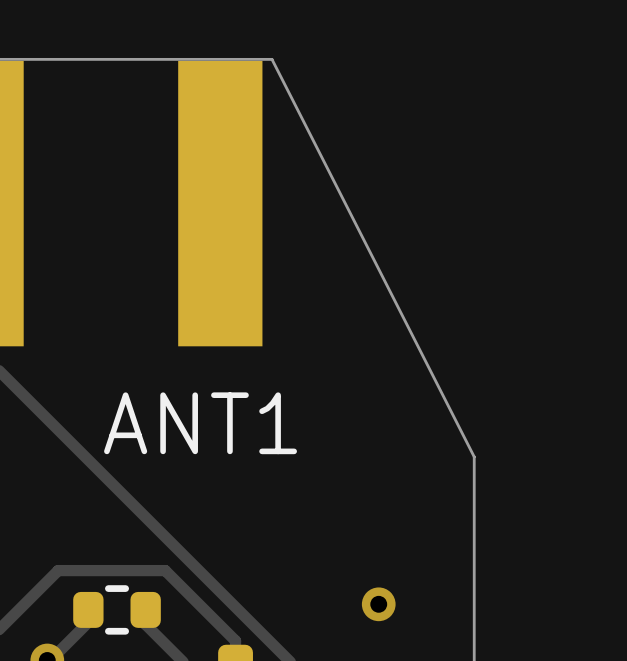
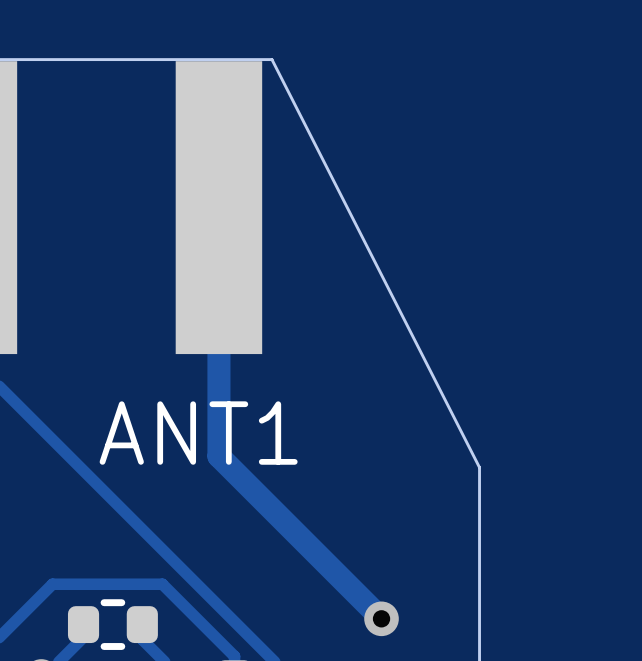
track: none -> (218, 207) (218, 456) (381, 618)

